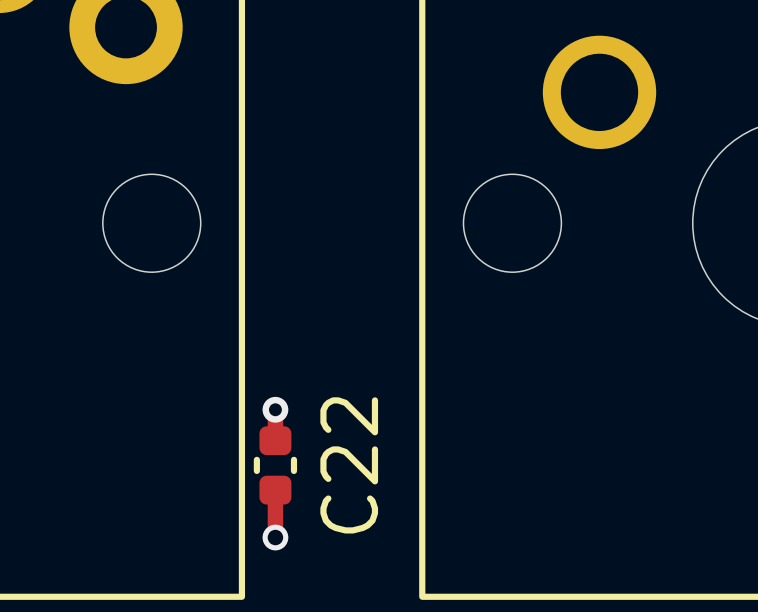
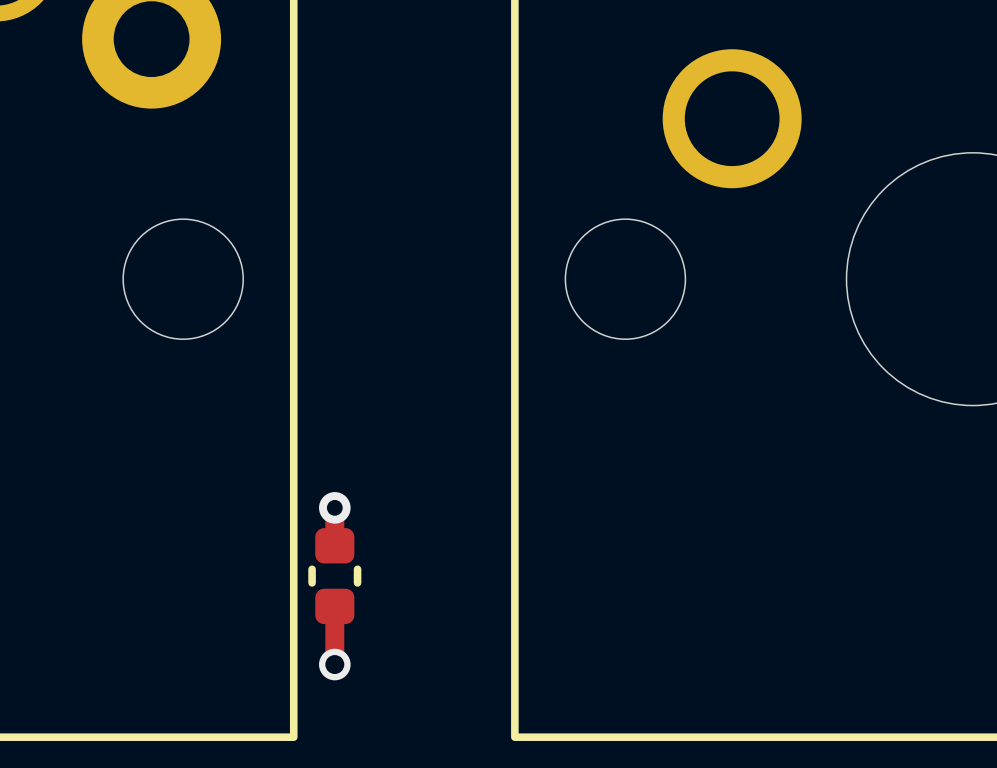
C22 name: C22 (349, 465) -> none

